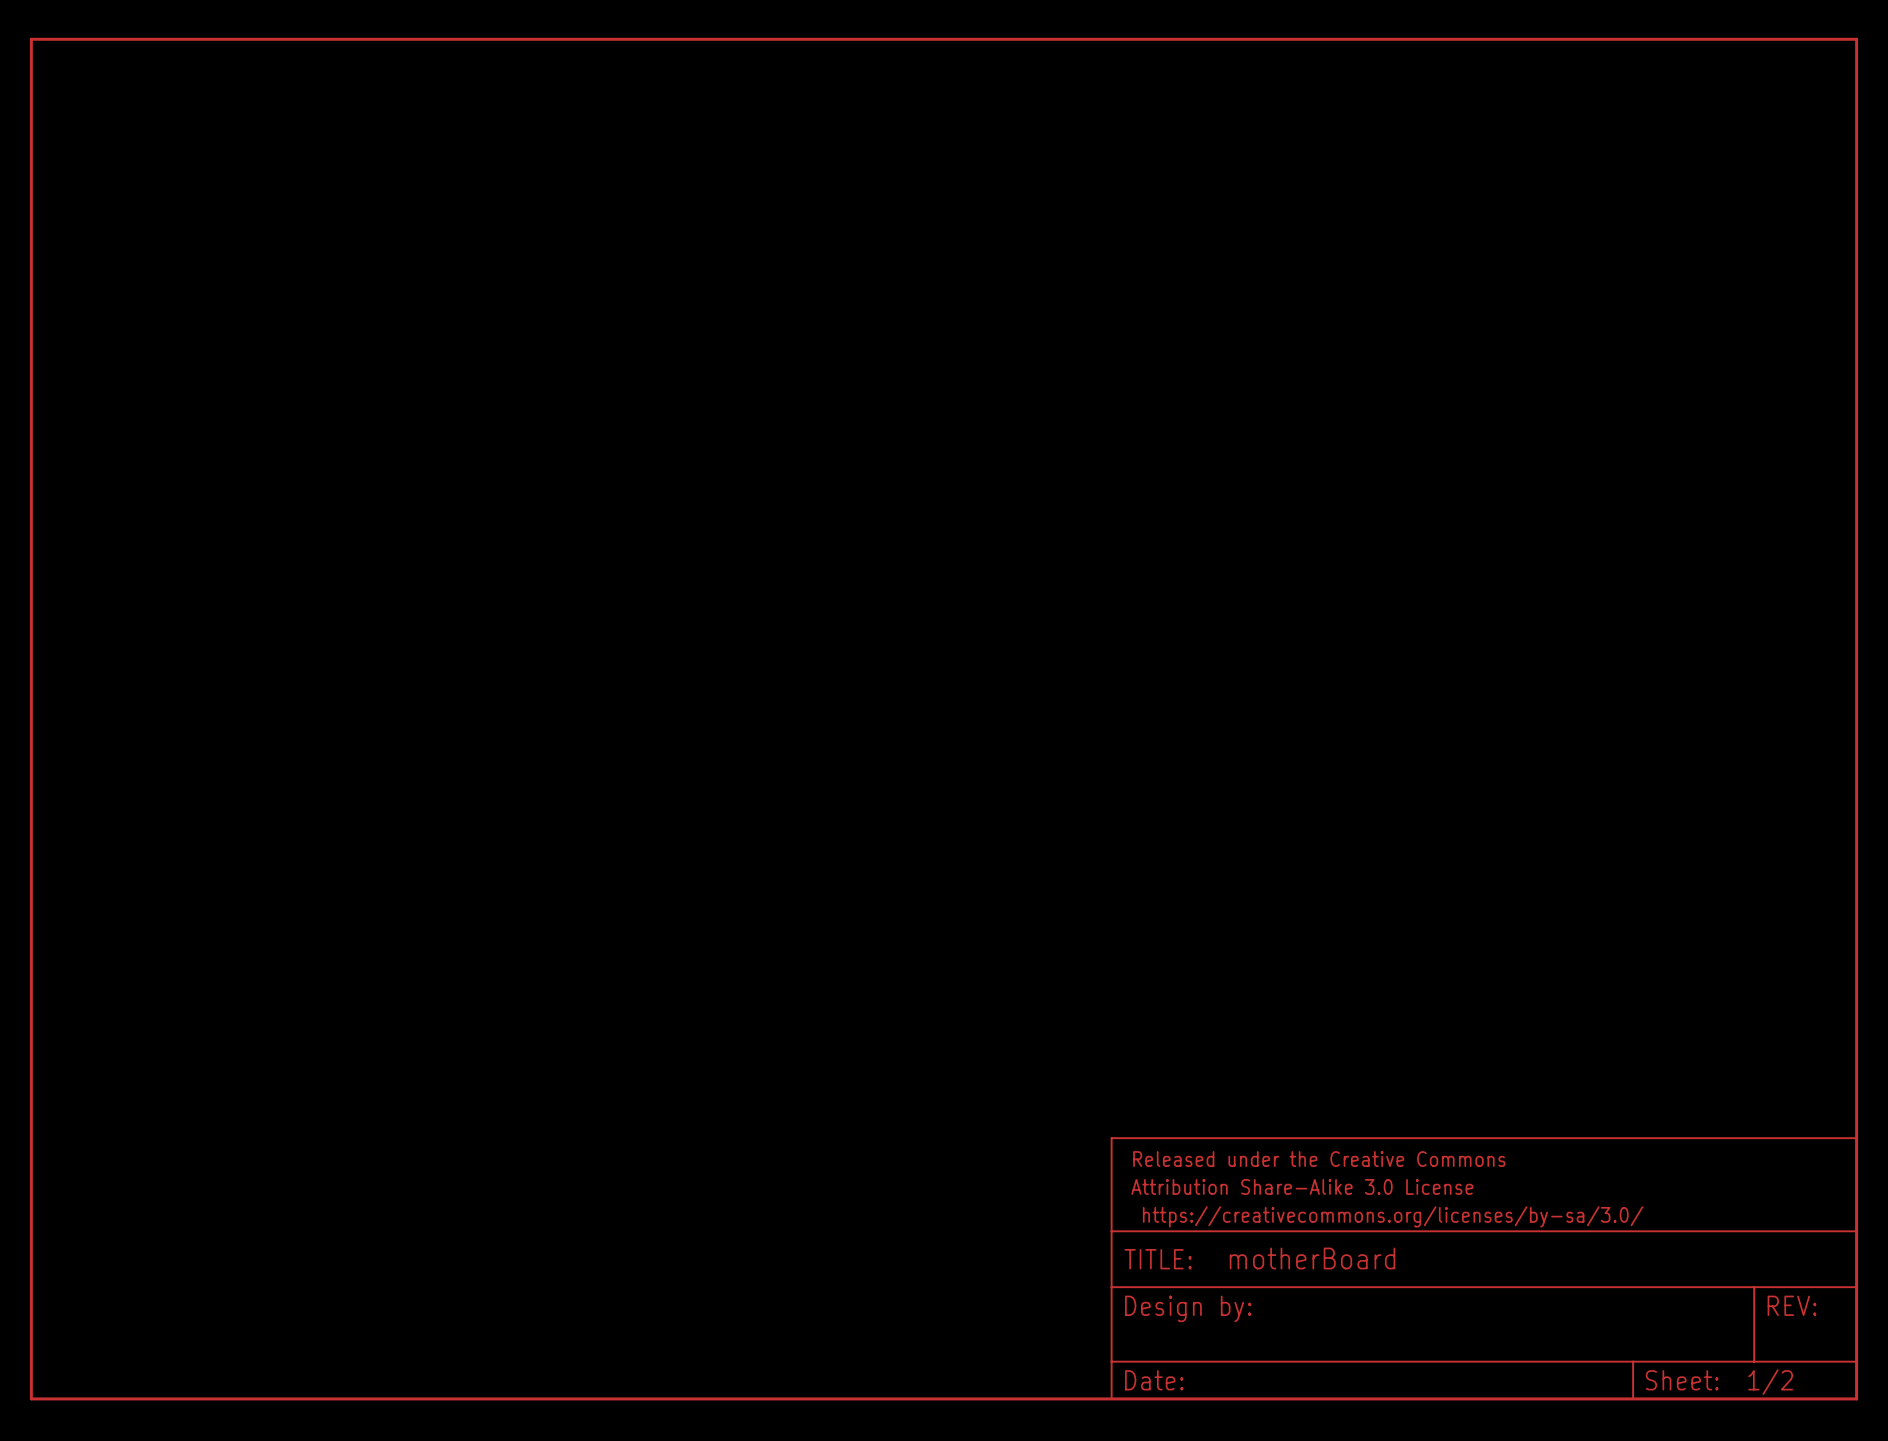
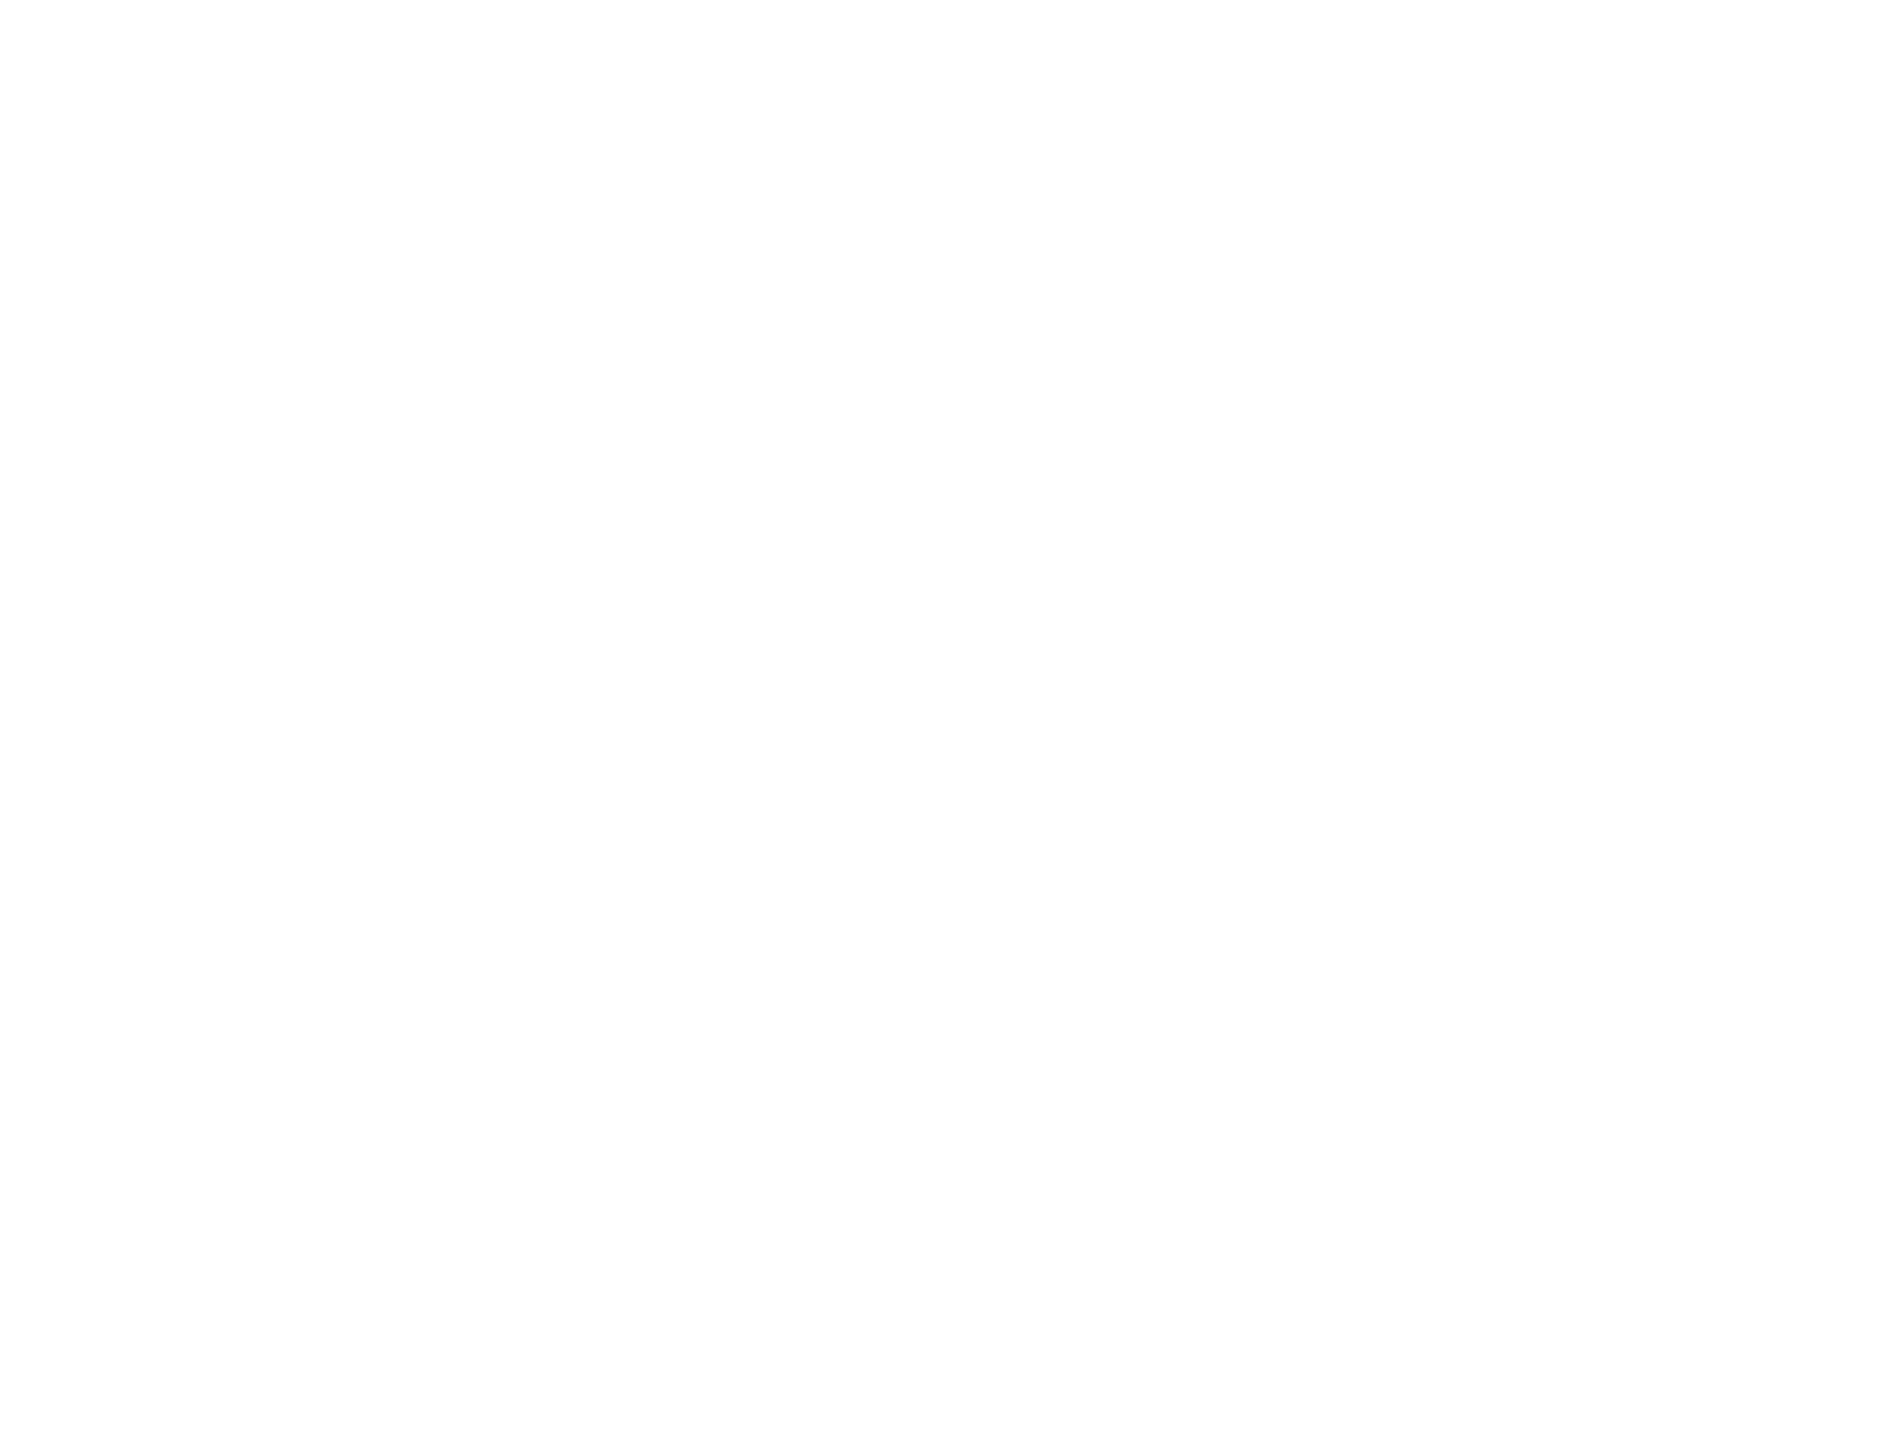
part: (943, 719) -> none
part: (1484, 1268) -> none

